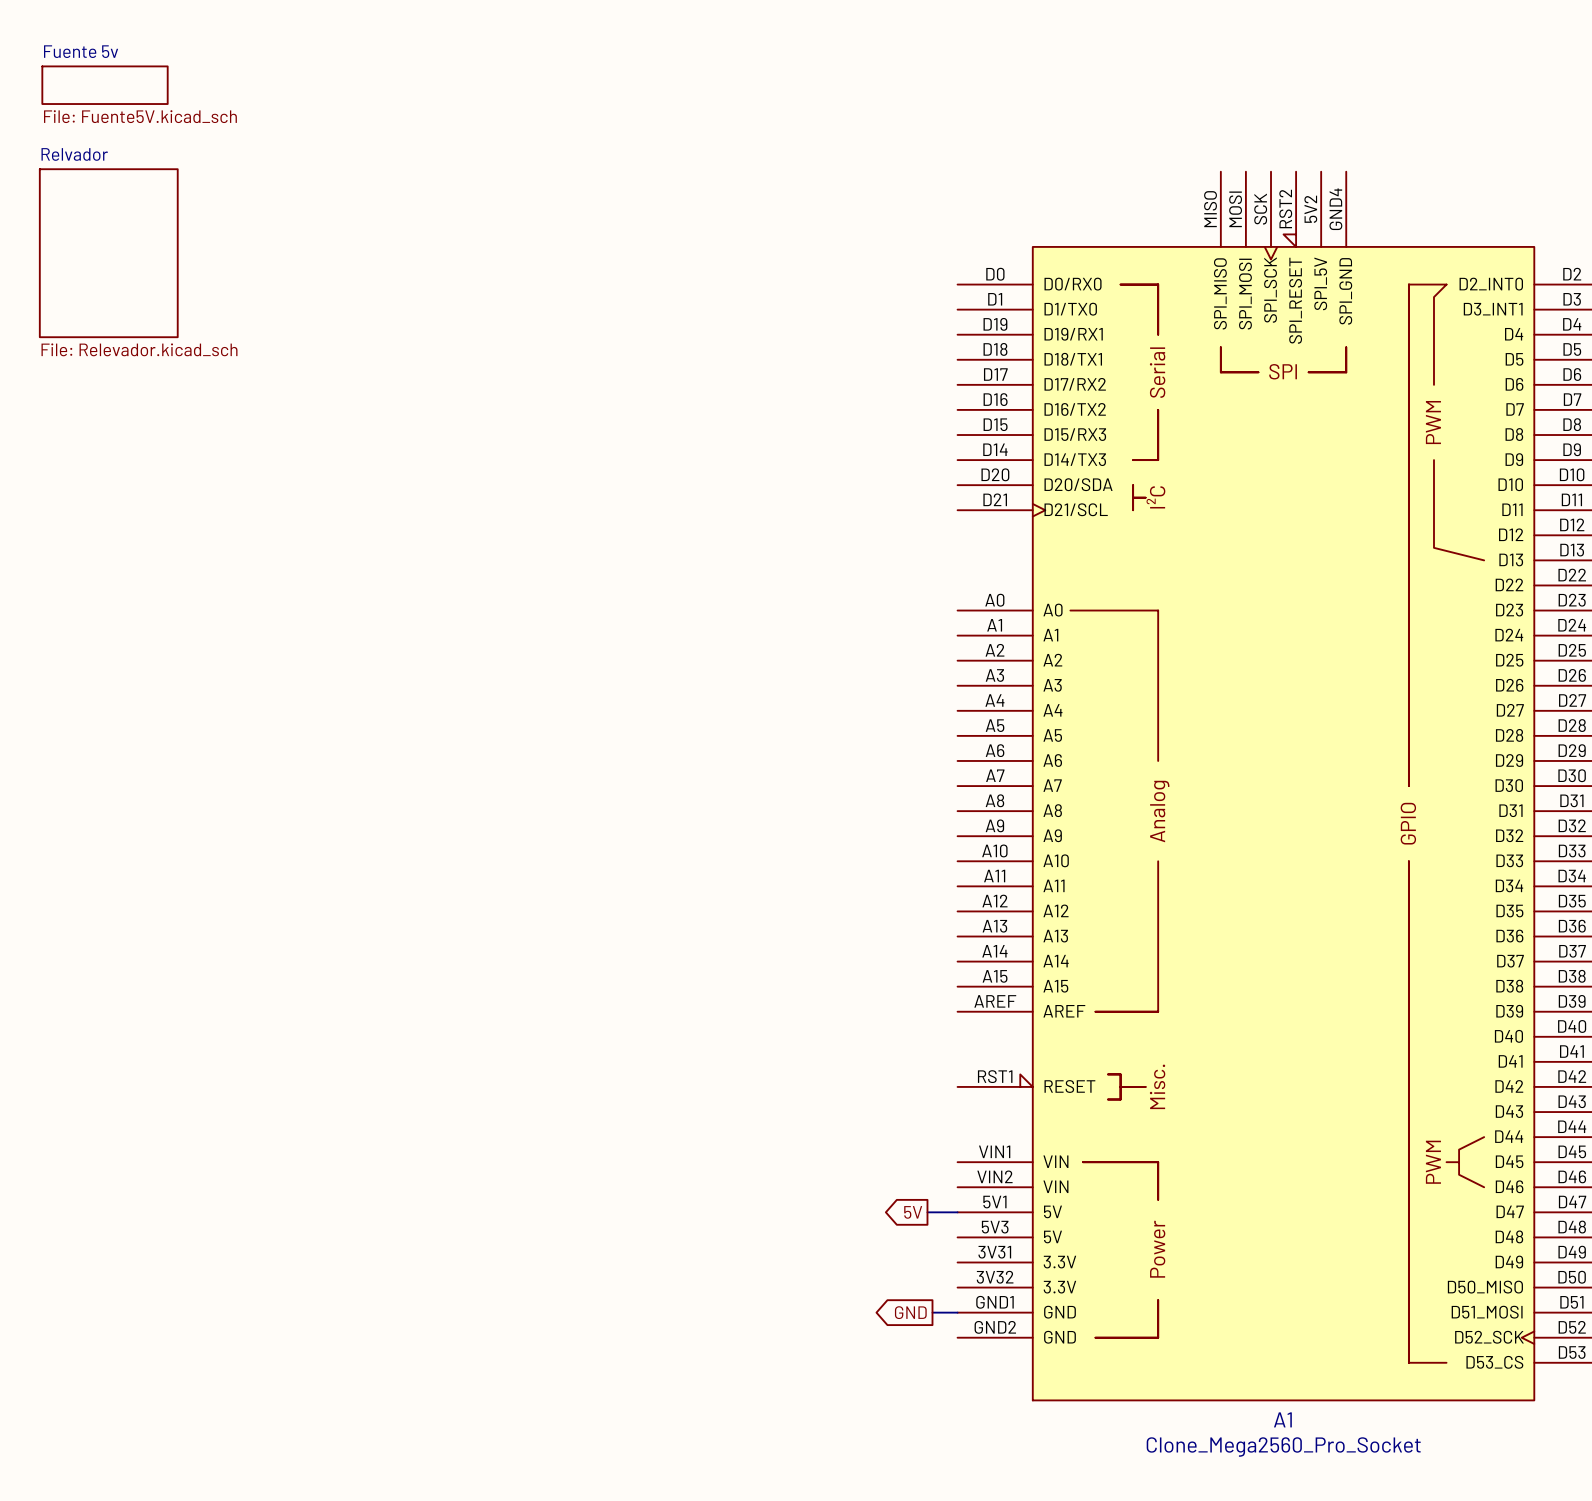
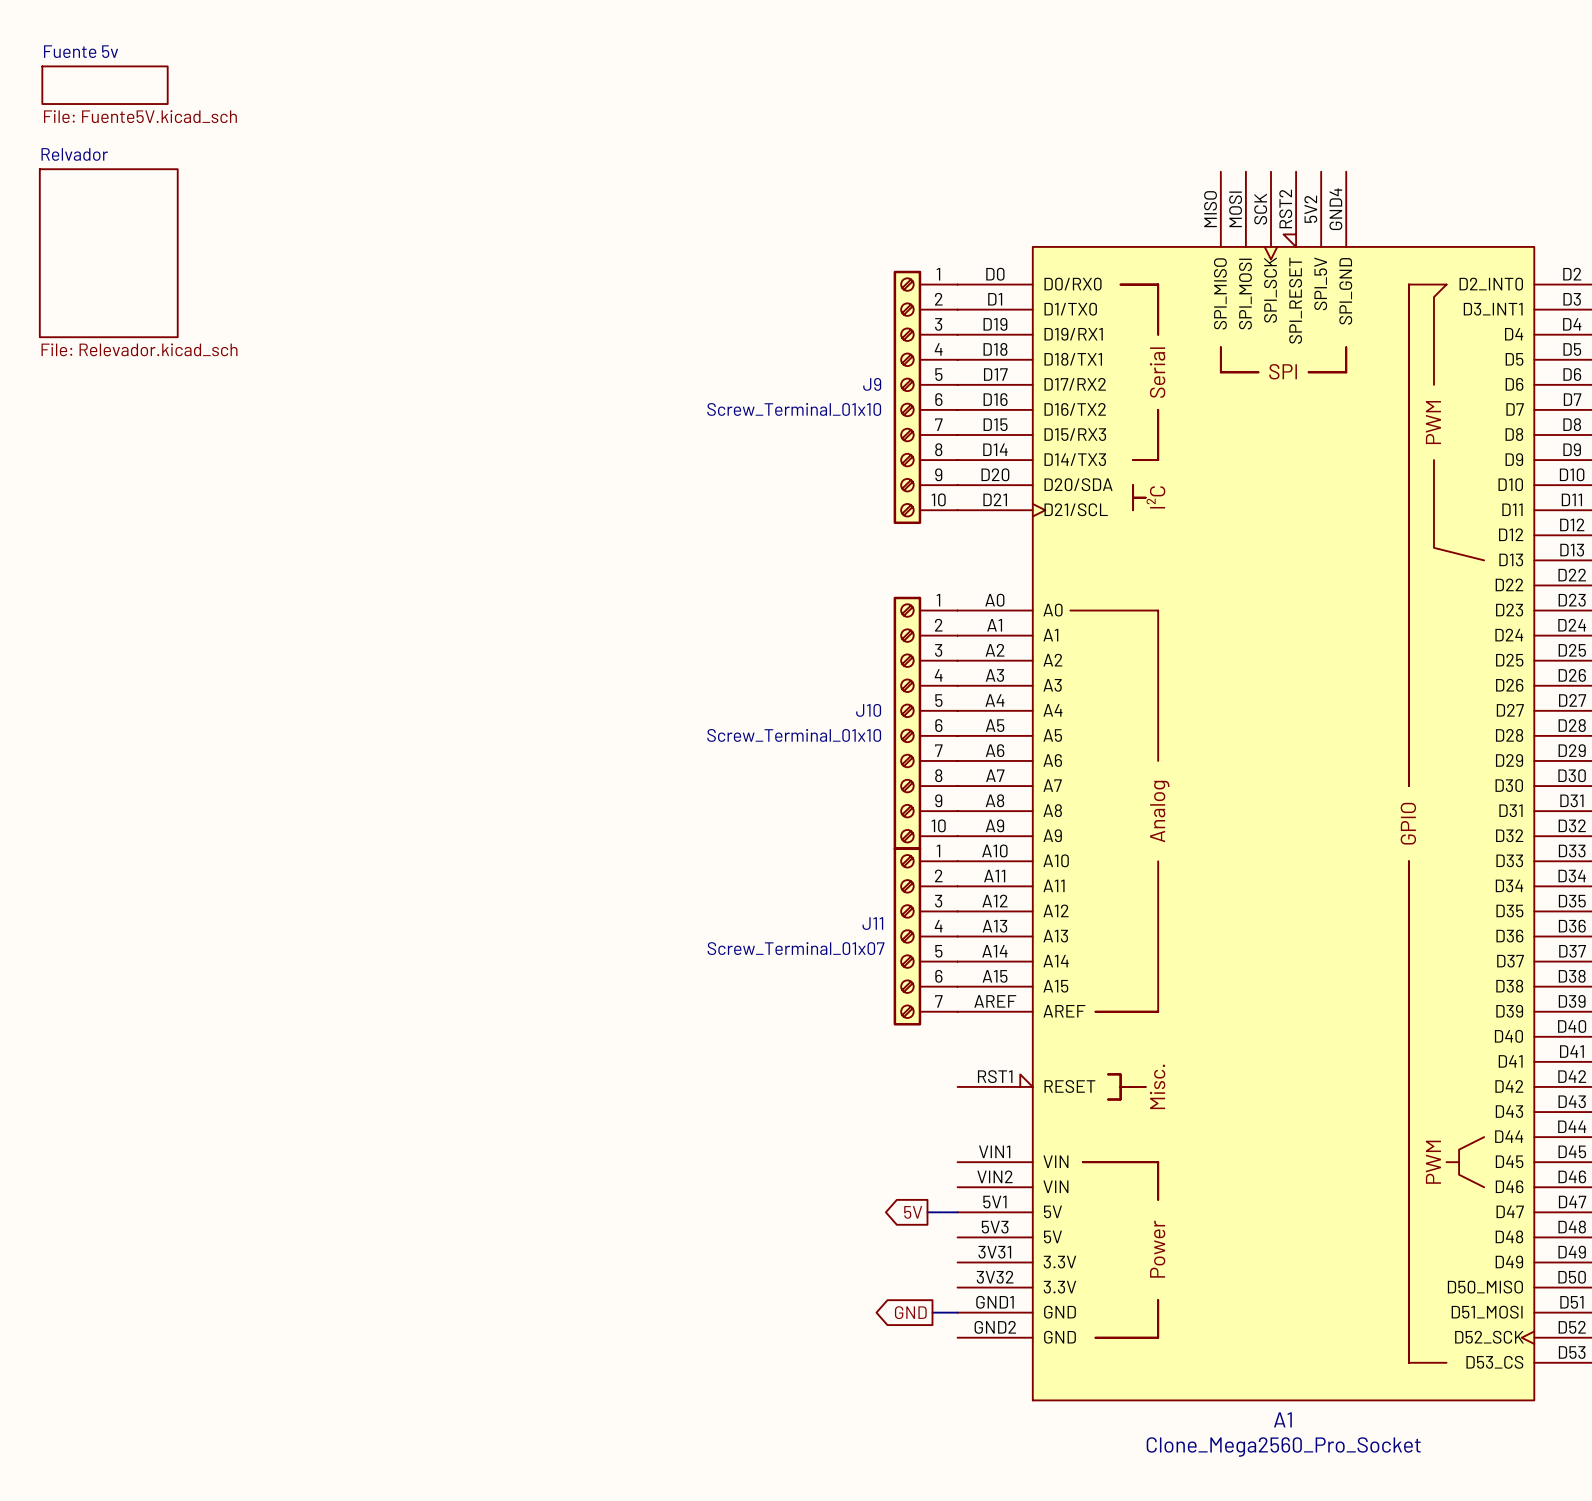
J9: none -> Screw_Terminal_01x10 (925, 397)
J10: none -> Screw_Terminal_01x10 (925, 723)
J11: none -> Screw_Terminal_01x07 (925, 936)

